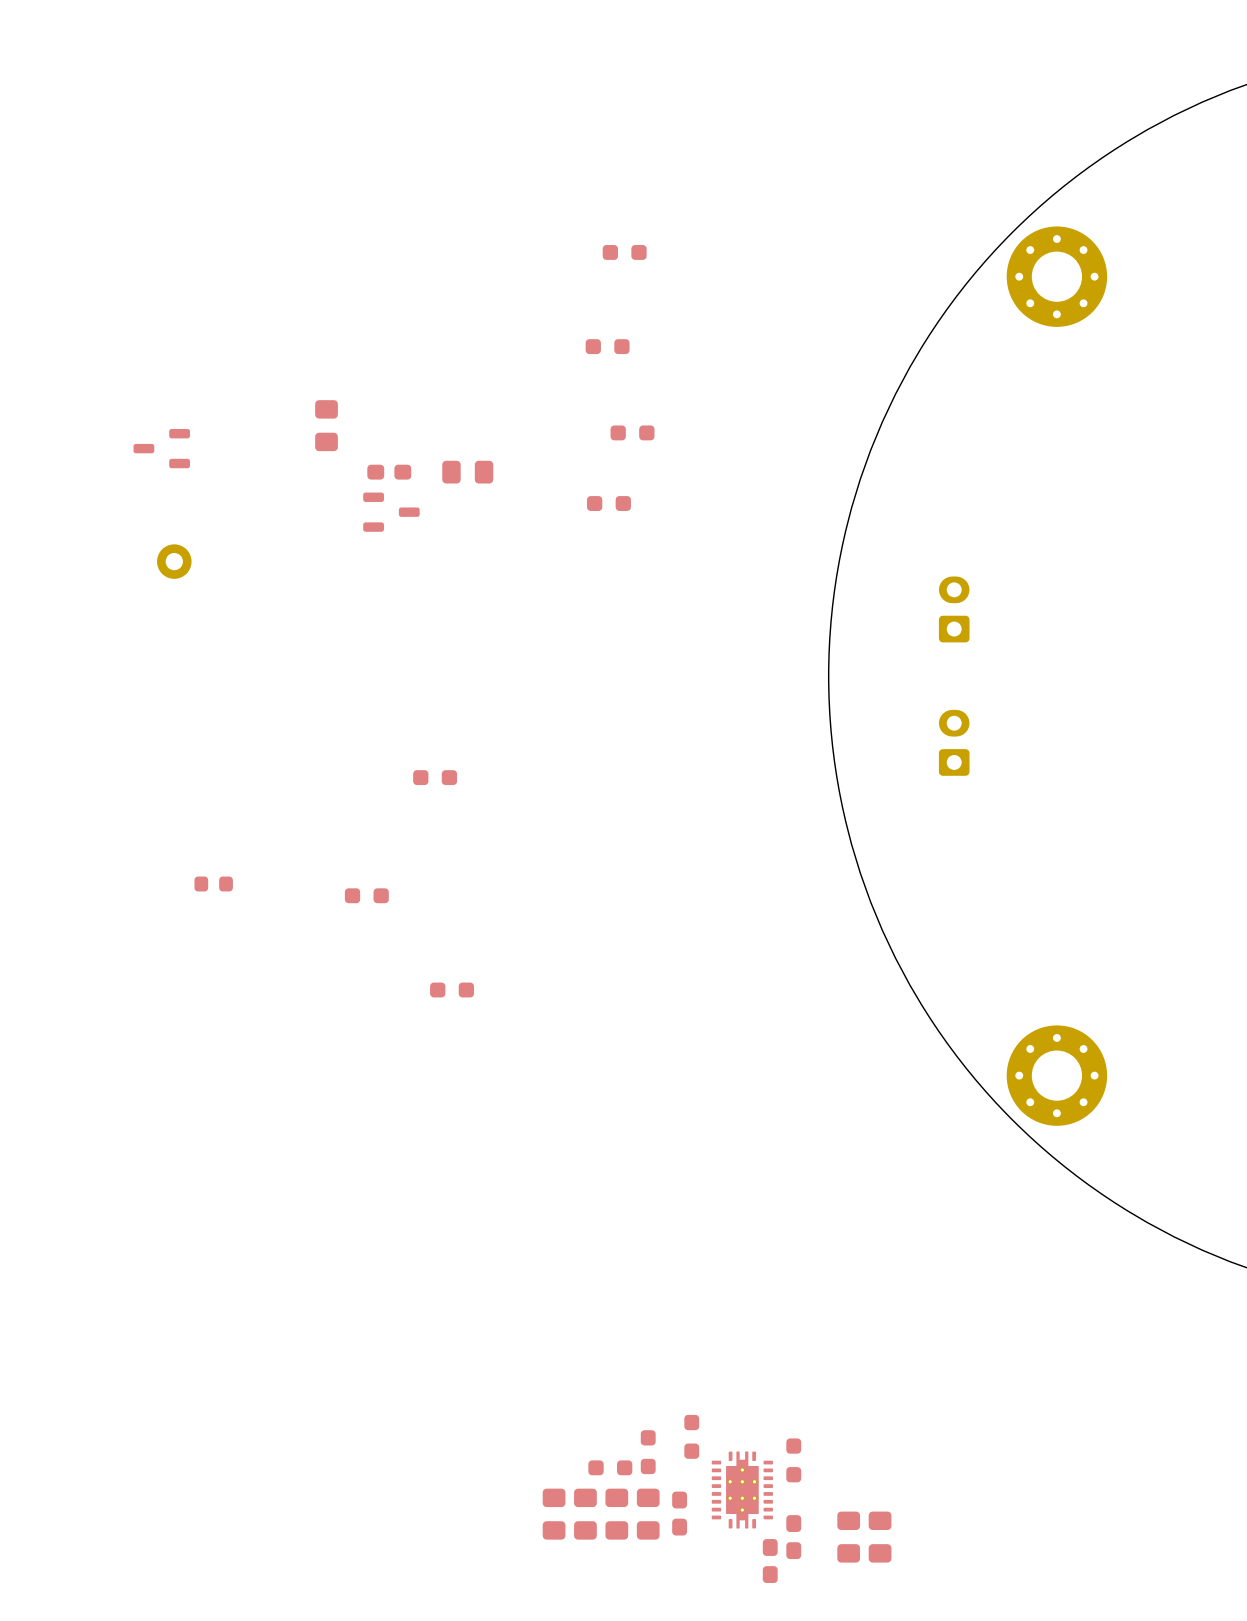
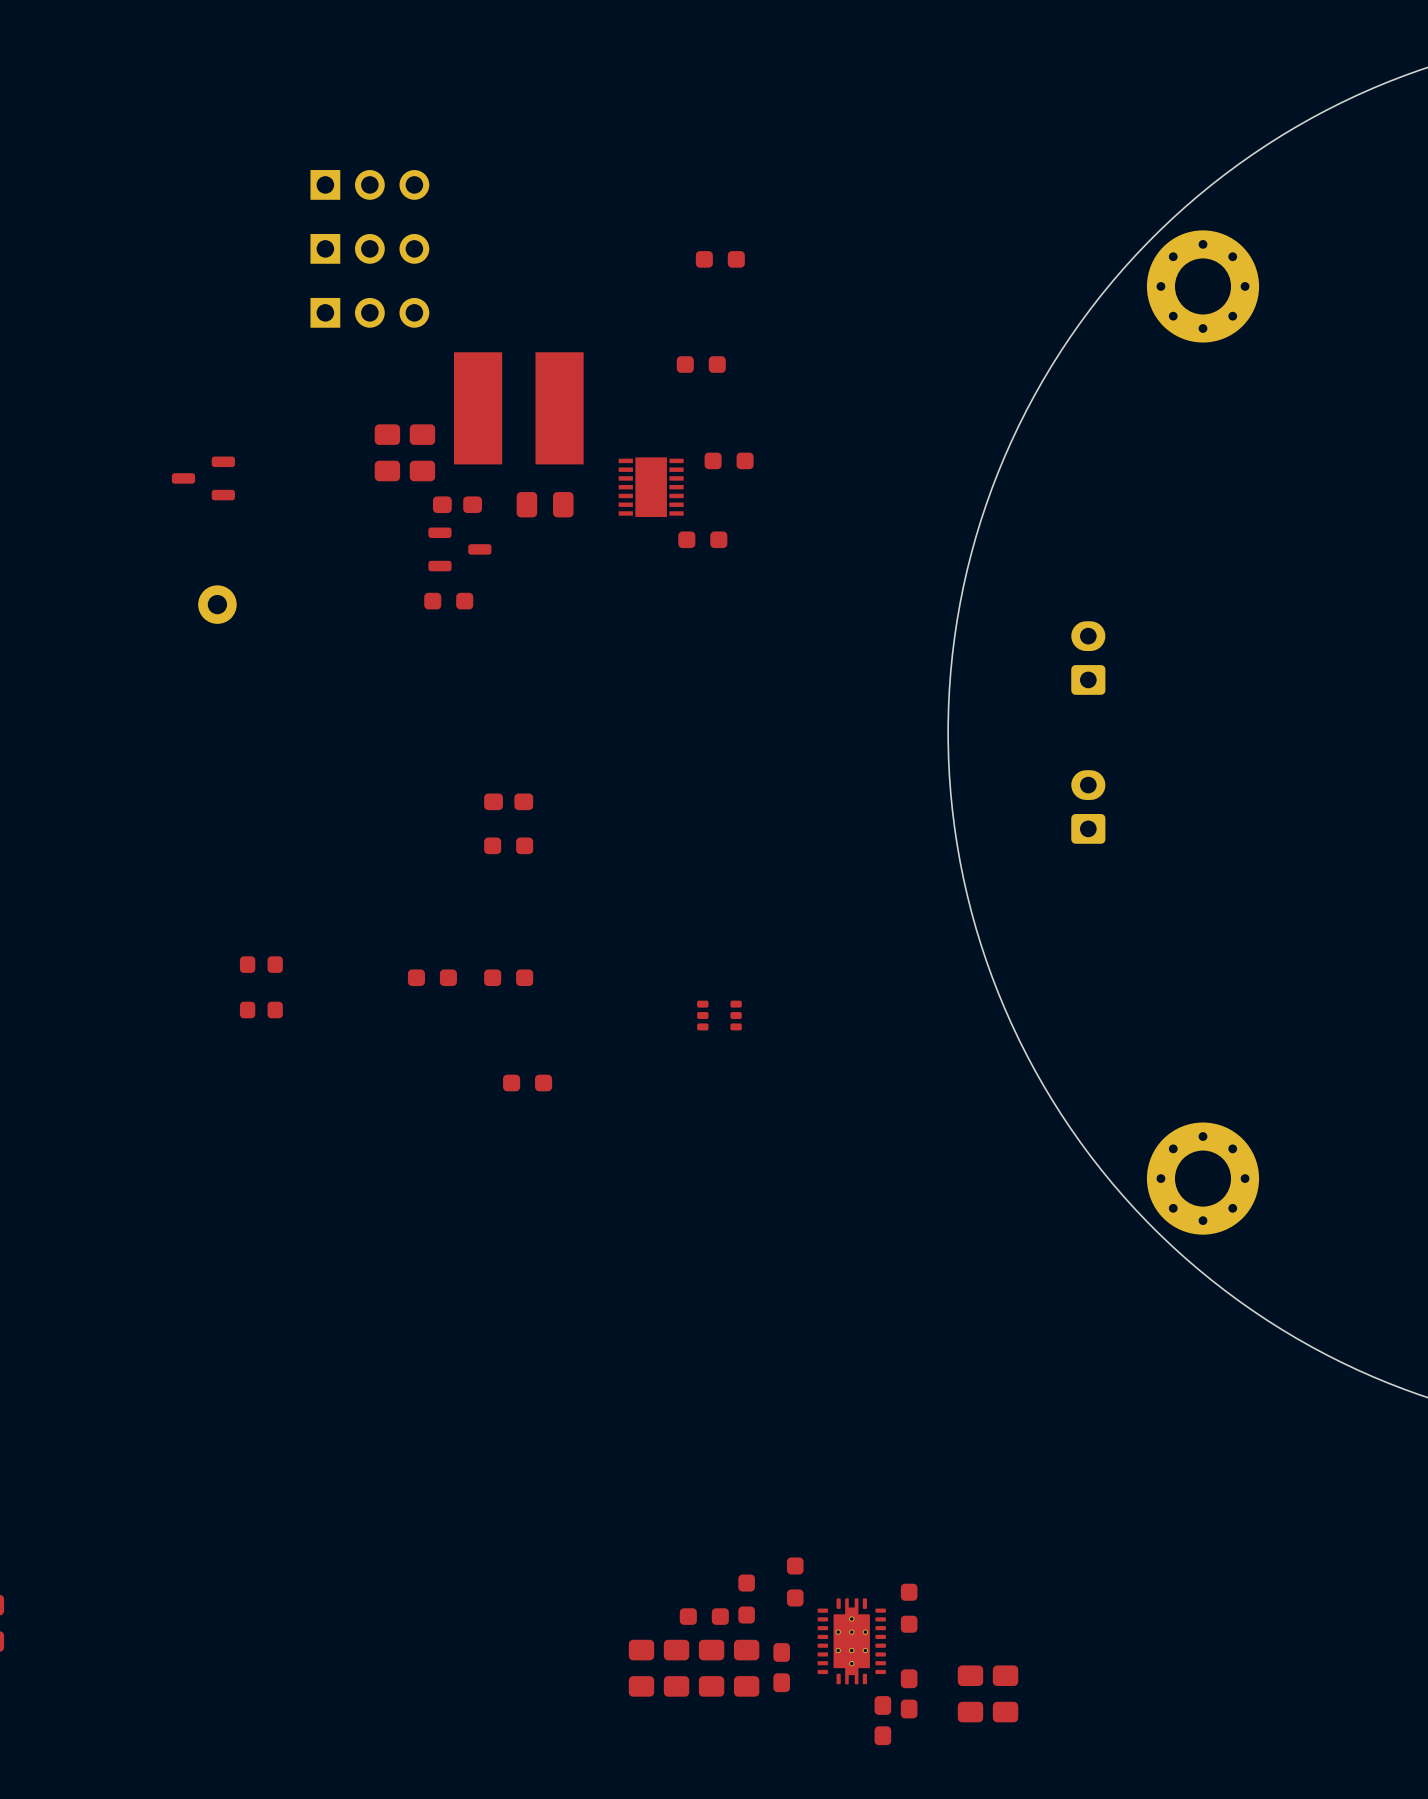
part: none -> (369, 184)
part: none -> (369, 248)
part: none -> (369, 312)
part: none -> (518, 408)
part: none -> (422, 452)
part: none -> (651, 487)
part: none -> (448, 601)
part: none -> (508, 801)
part: none -> (508, 977)
part: none -> (261, 1009)
part: none -> (719, 1015)

